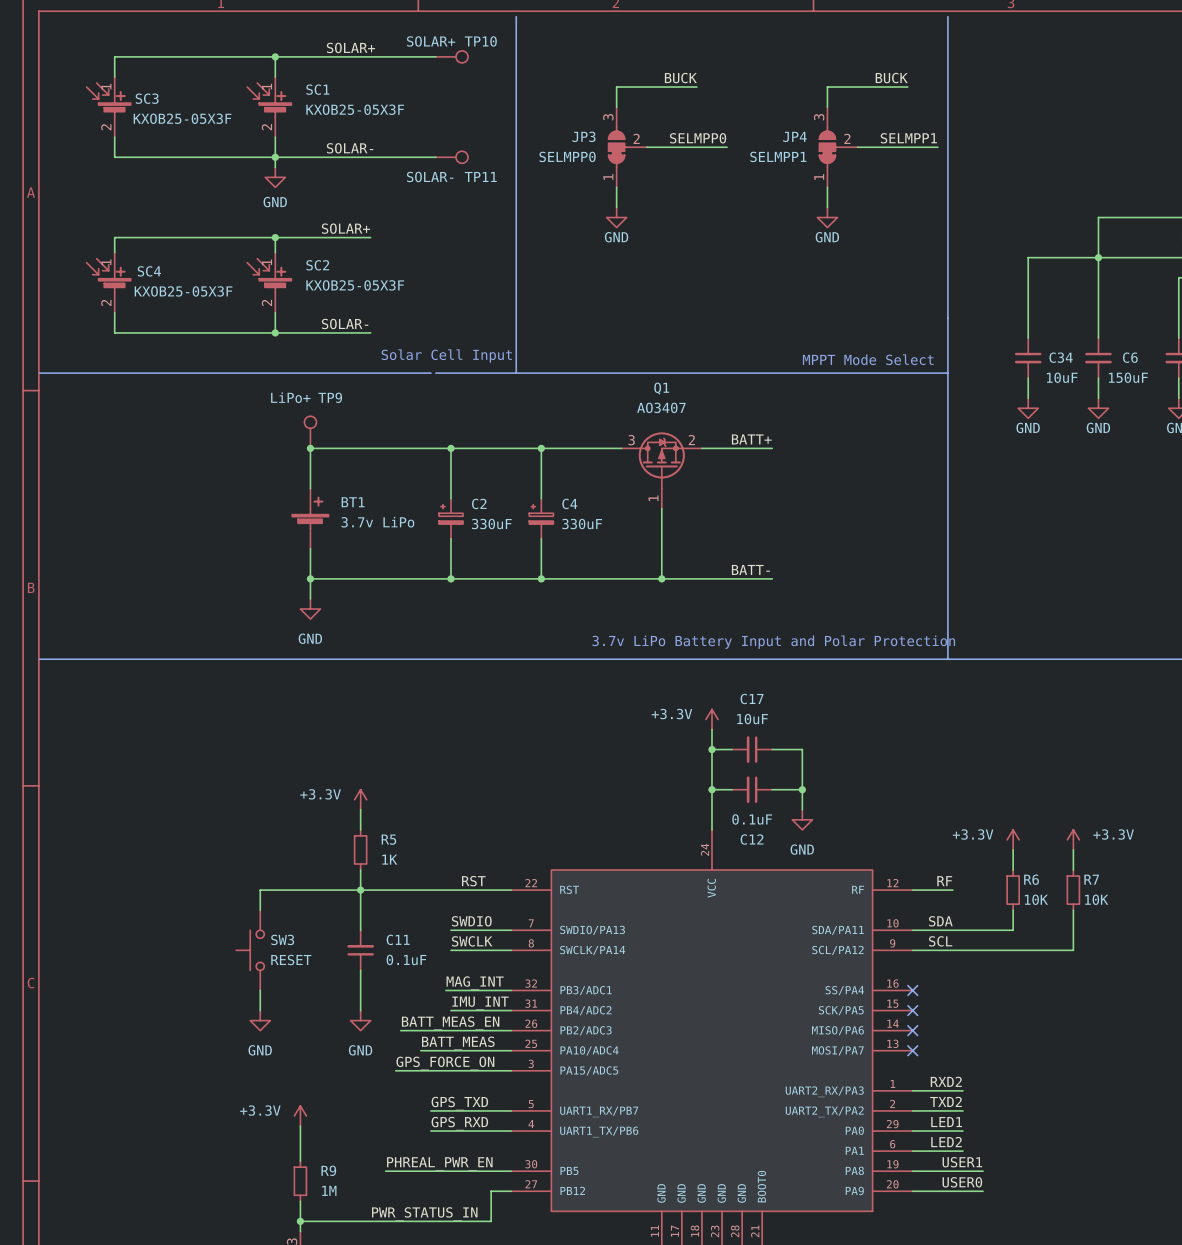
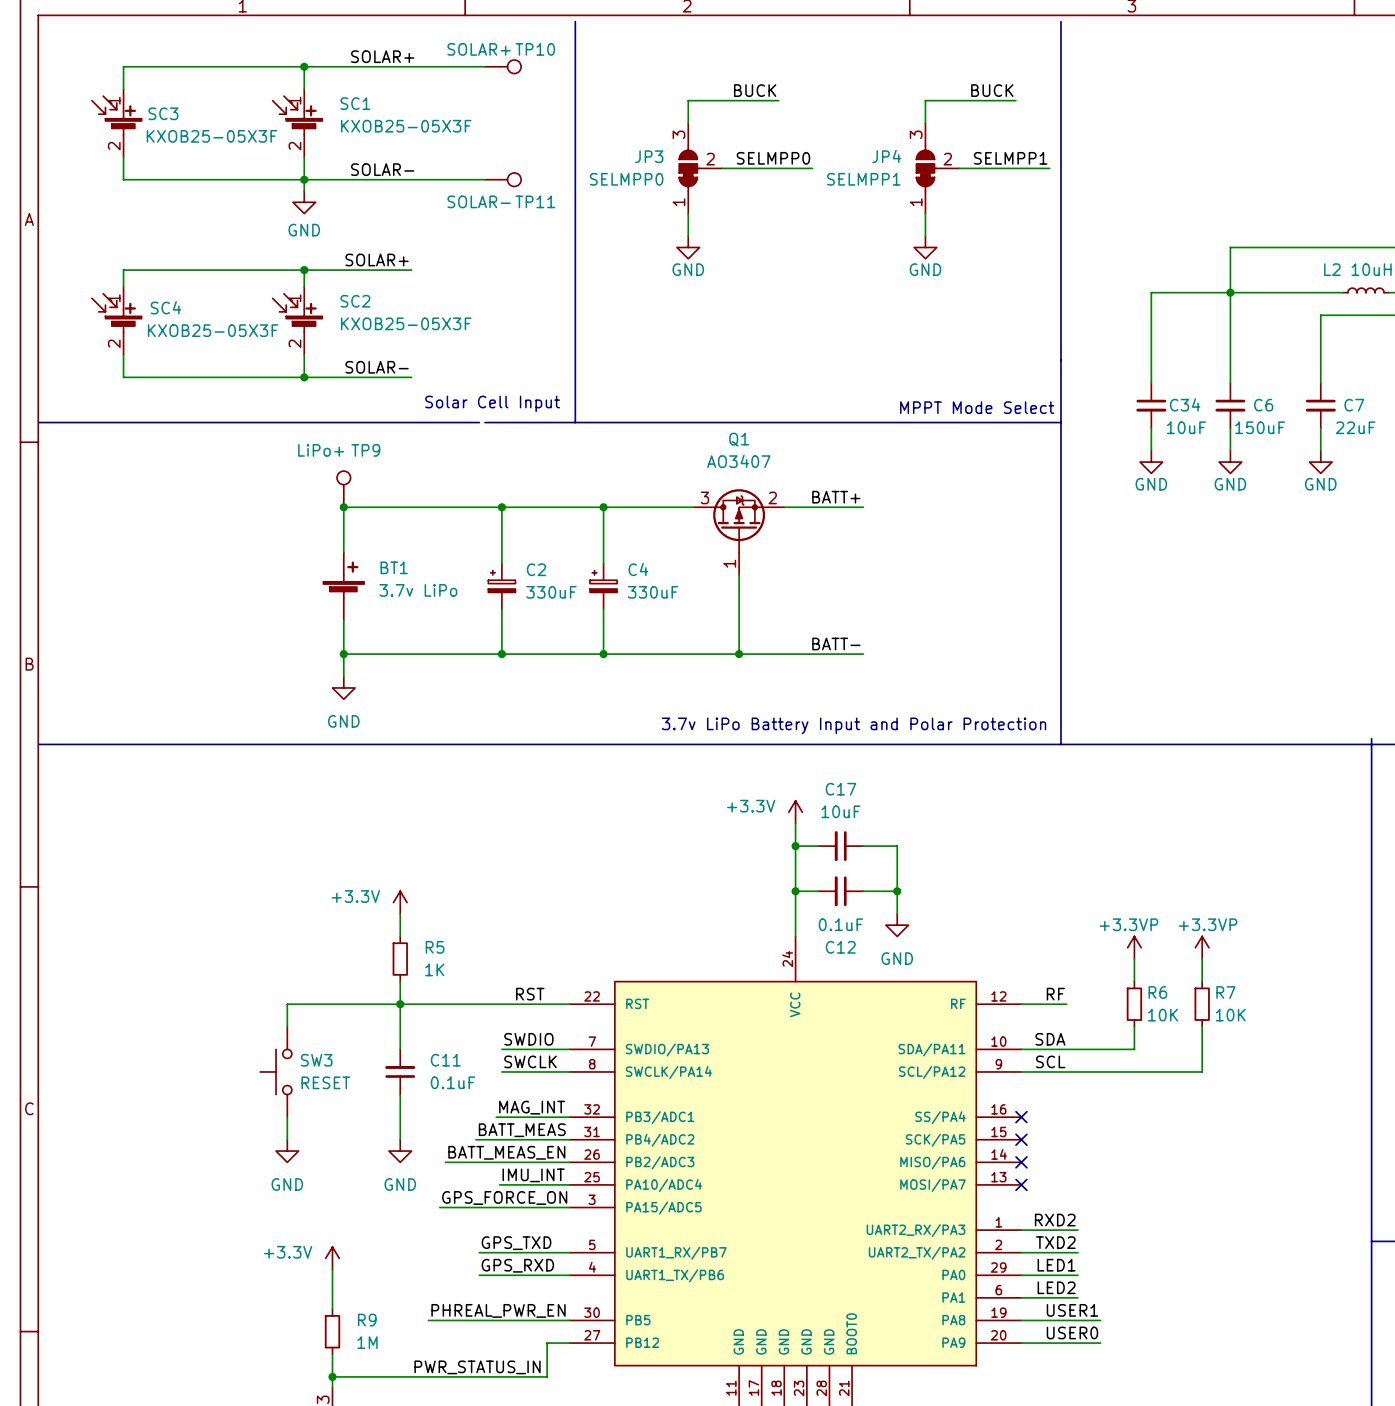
power symbol: +3.3V (1013, 839) -> +3.3VP (1134, 947)
power symbol: +3.3V (1073, 839) -> +3.3VP (1202, 947)
label position: IMU_INT (480, 1003) -> IMU_INT (533, 1175)
wire: none -> (475, 1139) (501, 1139)
label position: BATT_MEAS (458, 1043) -> BATT_MEAS (522, 1130)
wire: (420, 1050) (448, 1050) -> none

